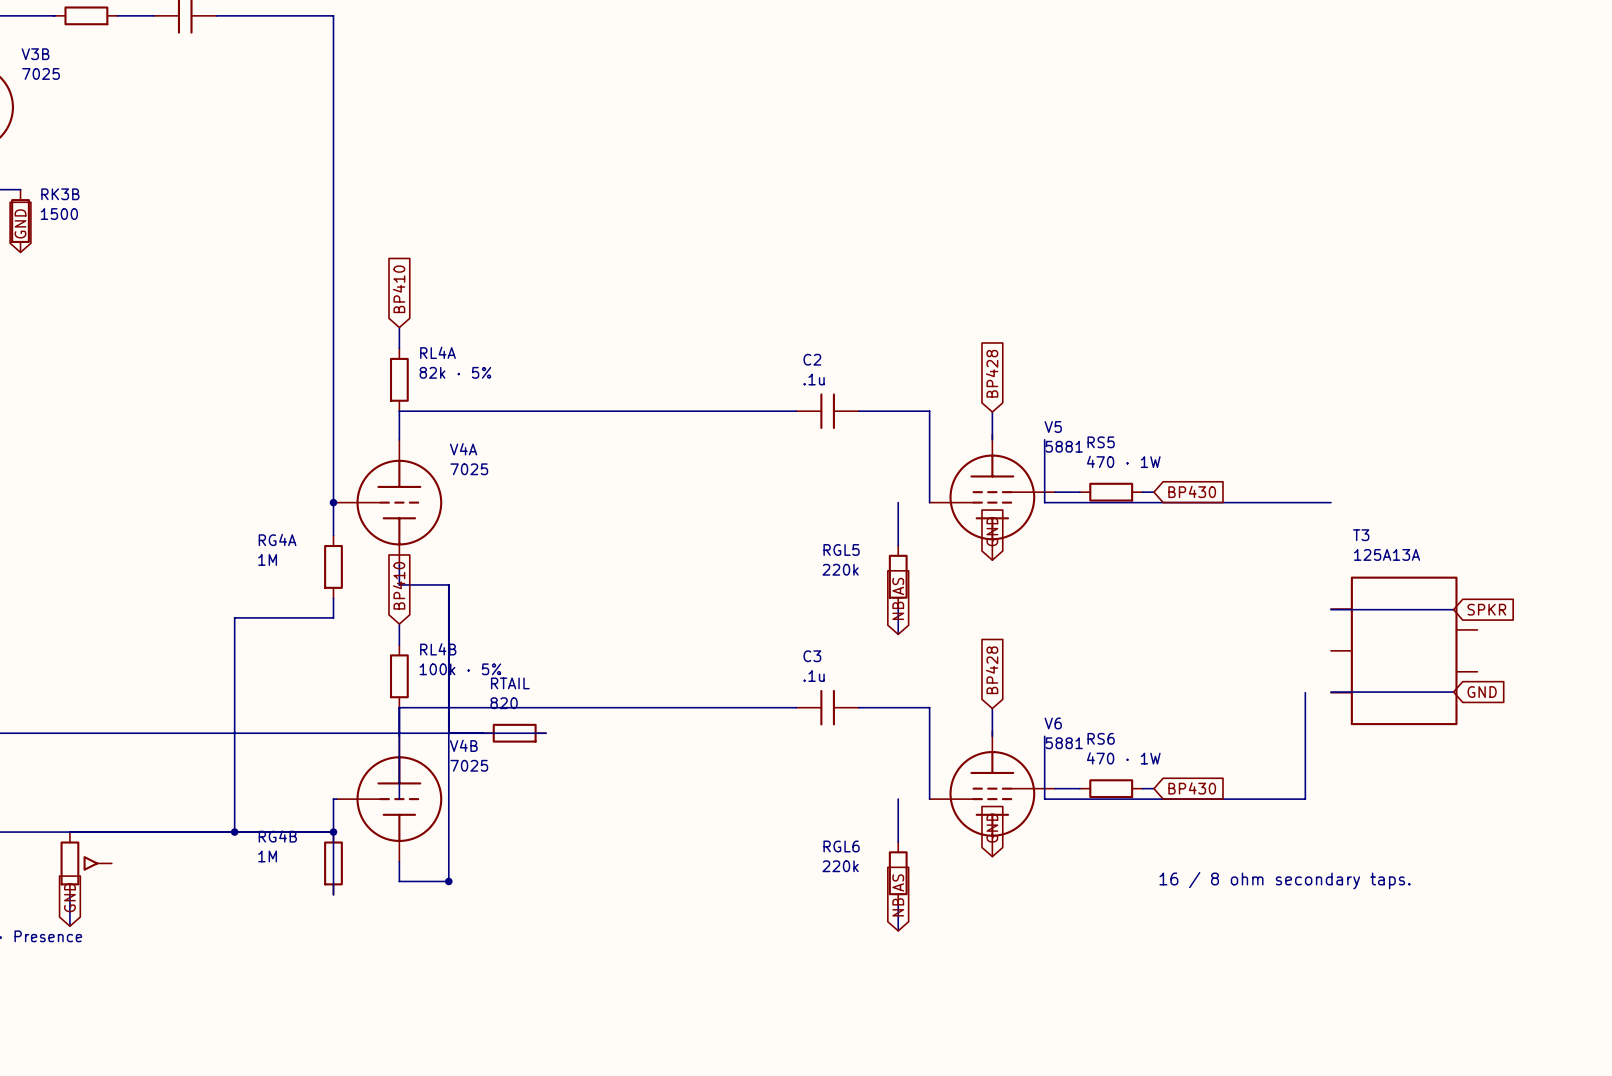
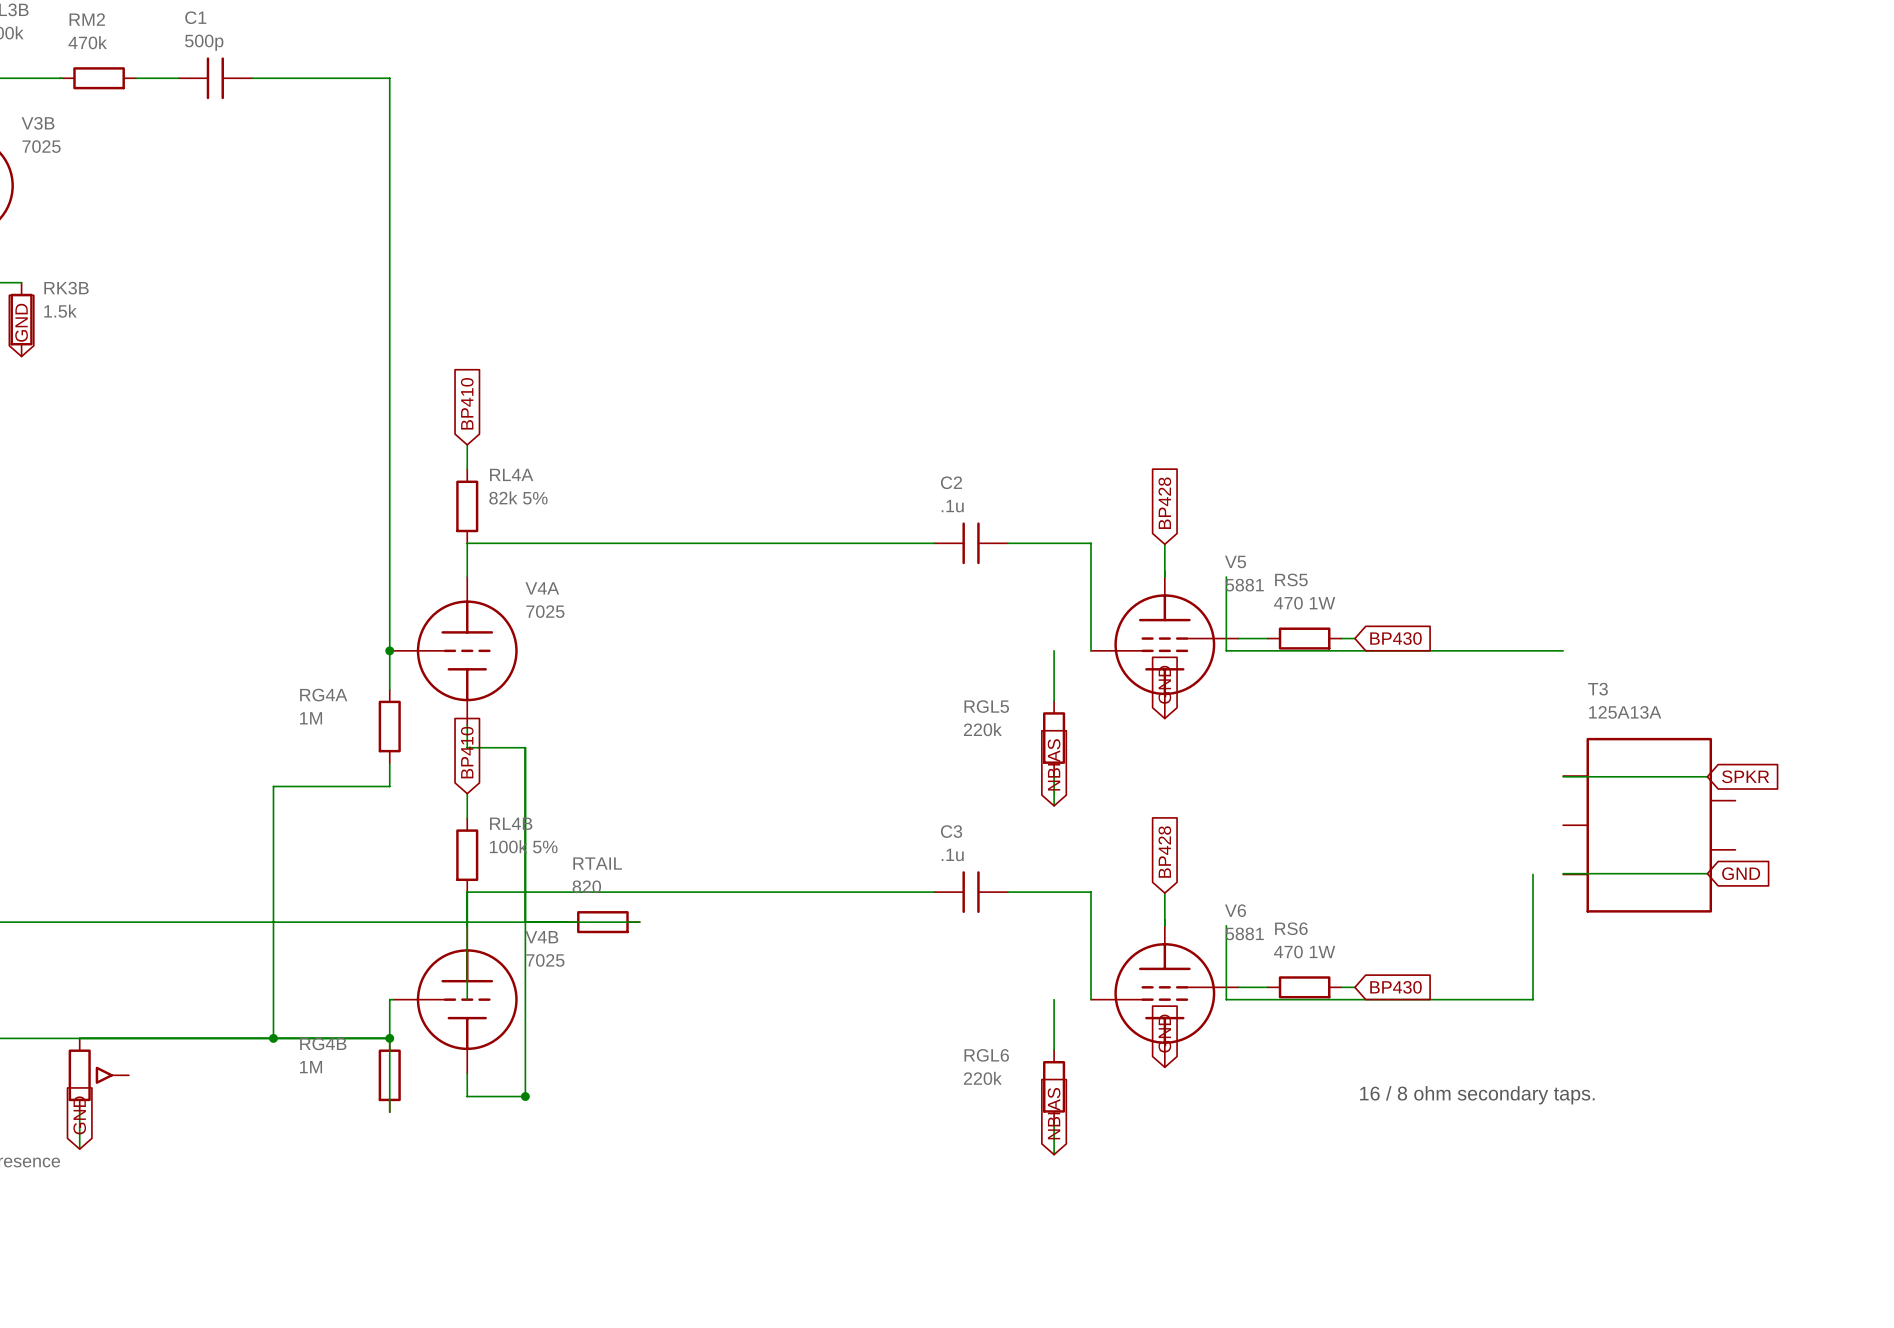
RK3B value: 1500 (59, 214) -> 1.5k (60, 311)
RL4A value: 82k · 5% (455, 372) -> 82k 5% (518, 497)
RS5 value: 470 · 1W (1123, 461) -> 470 1W (1304, 603)
RL4B value: 100k · 5% (460, 669) -> 100k 5% (523, 846)
RS6 value: 470 · 1W (1123, 758) -> 470 1W (1304, 951)

